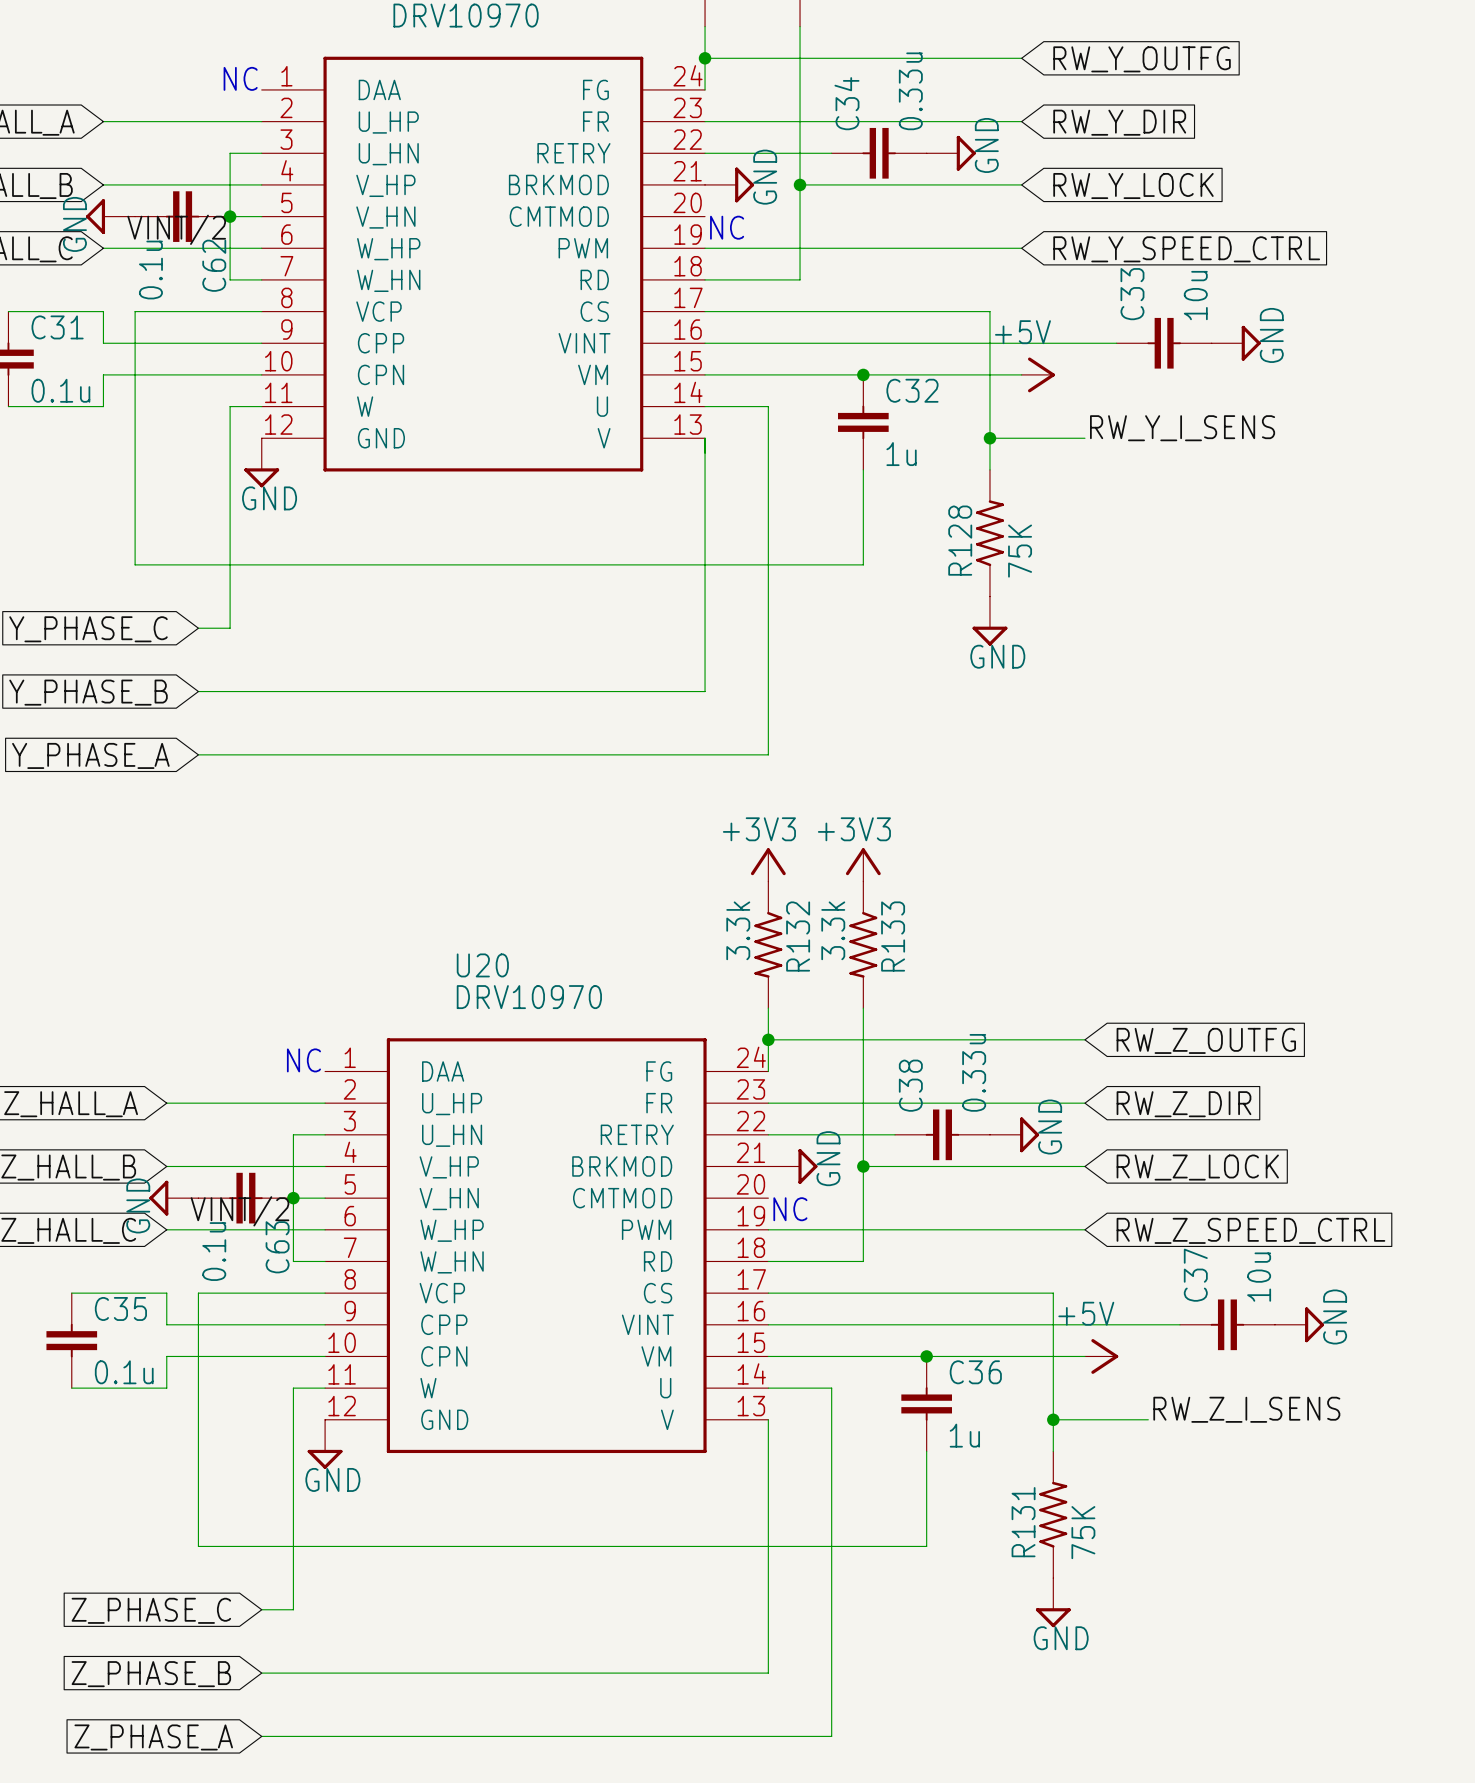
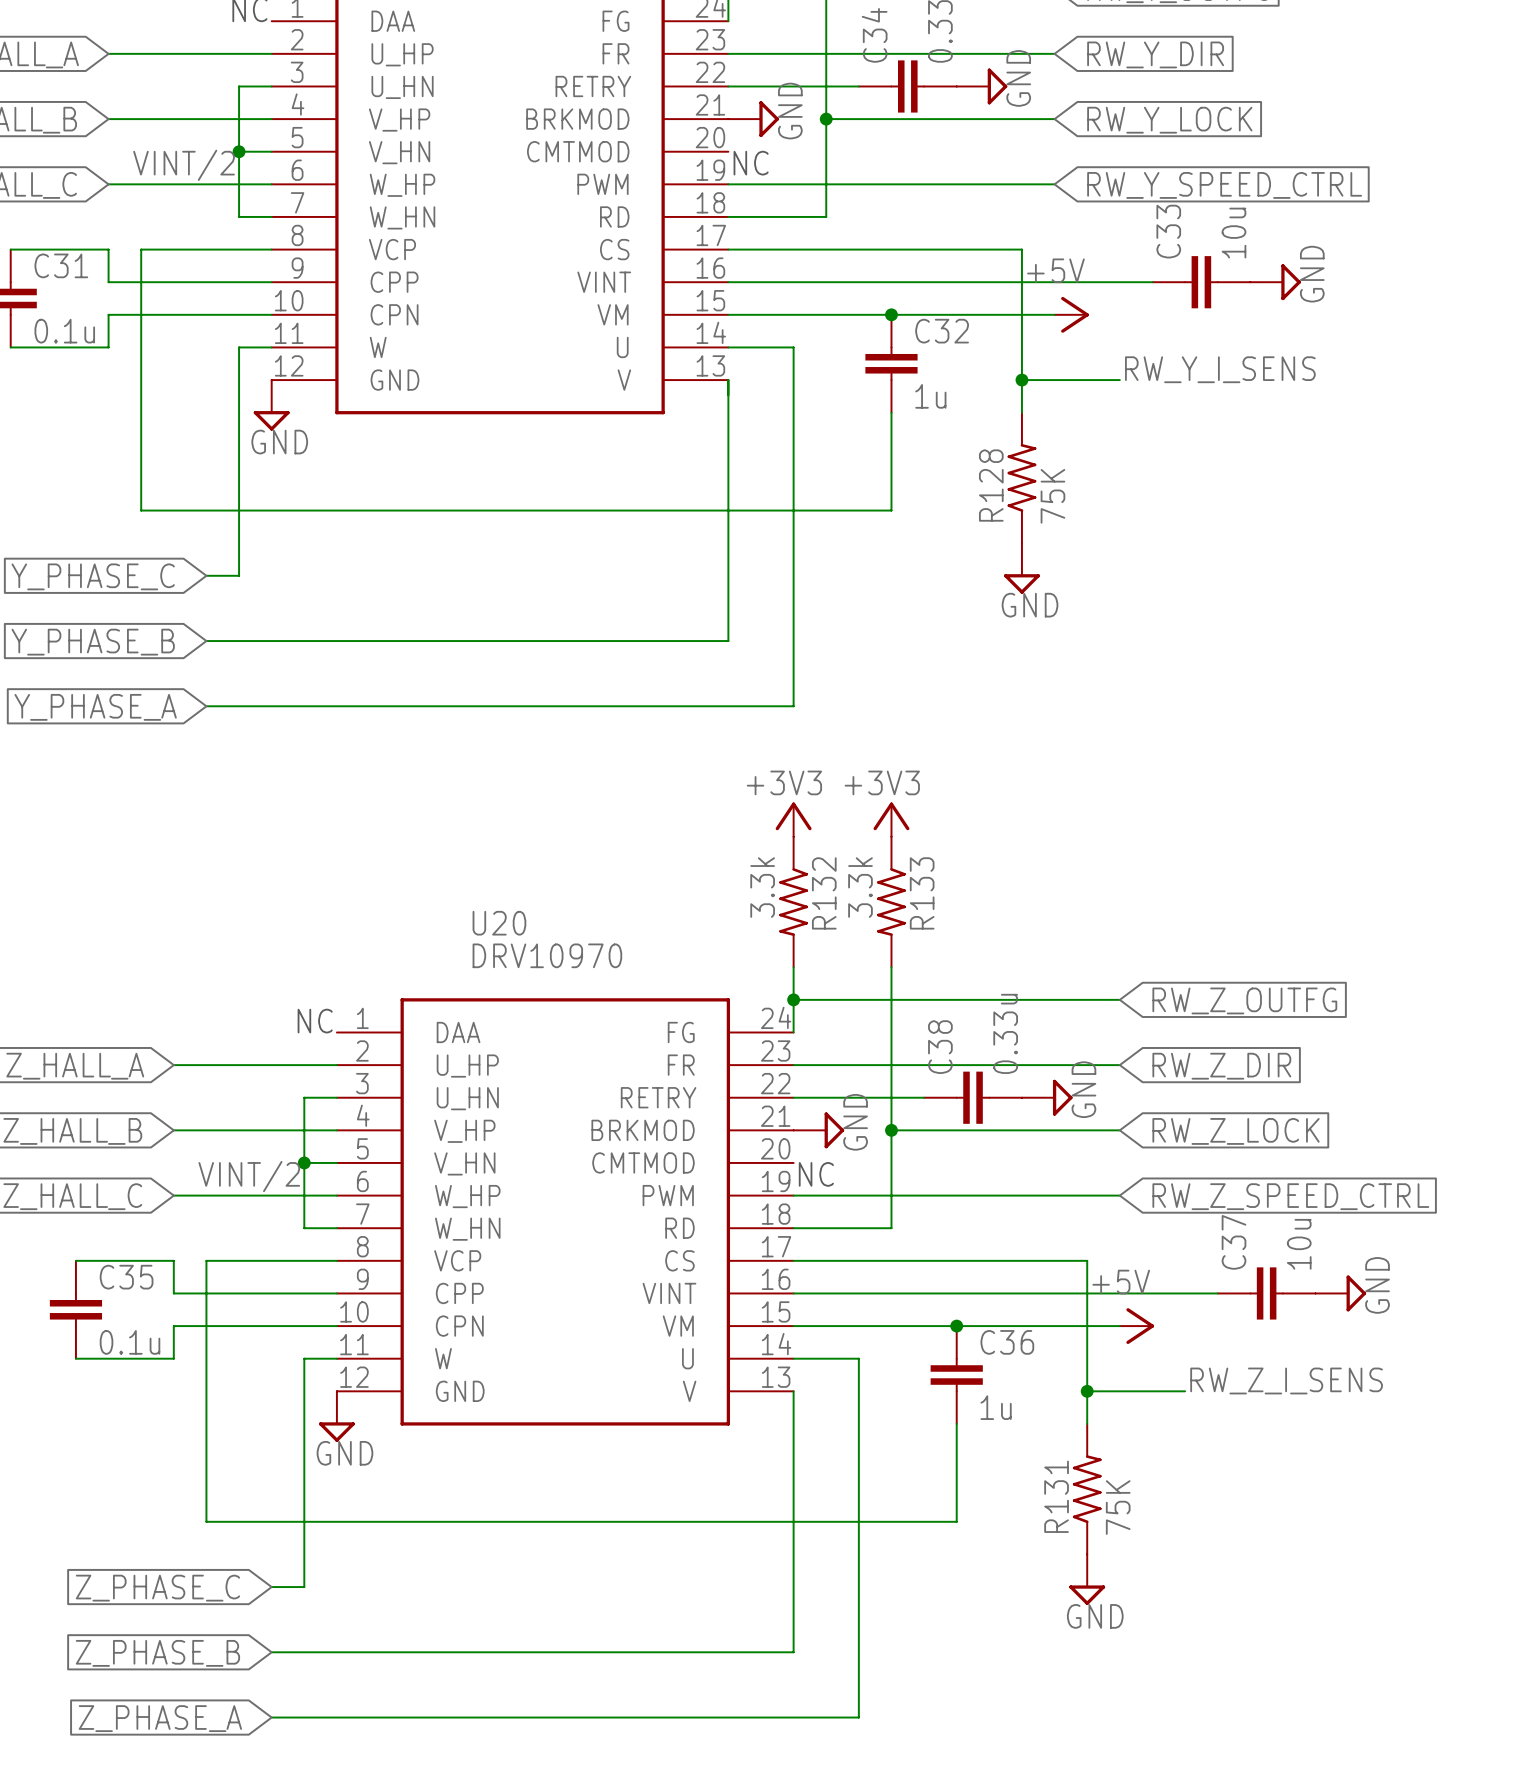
power symbol: GND (110, 216) -> none
C62: 0.1u (182, 216) -> none
power symbol: GND (173, 1198) -> none
C63: 0.1u (245, 1198) -> none

